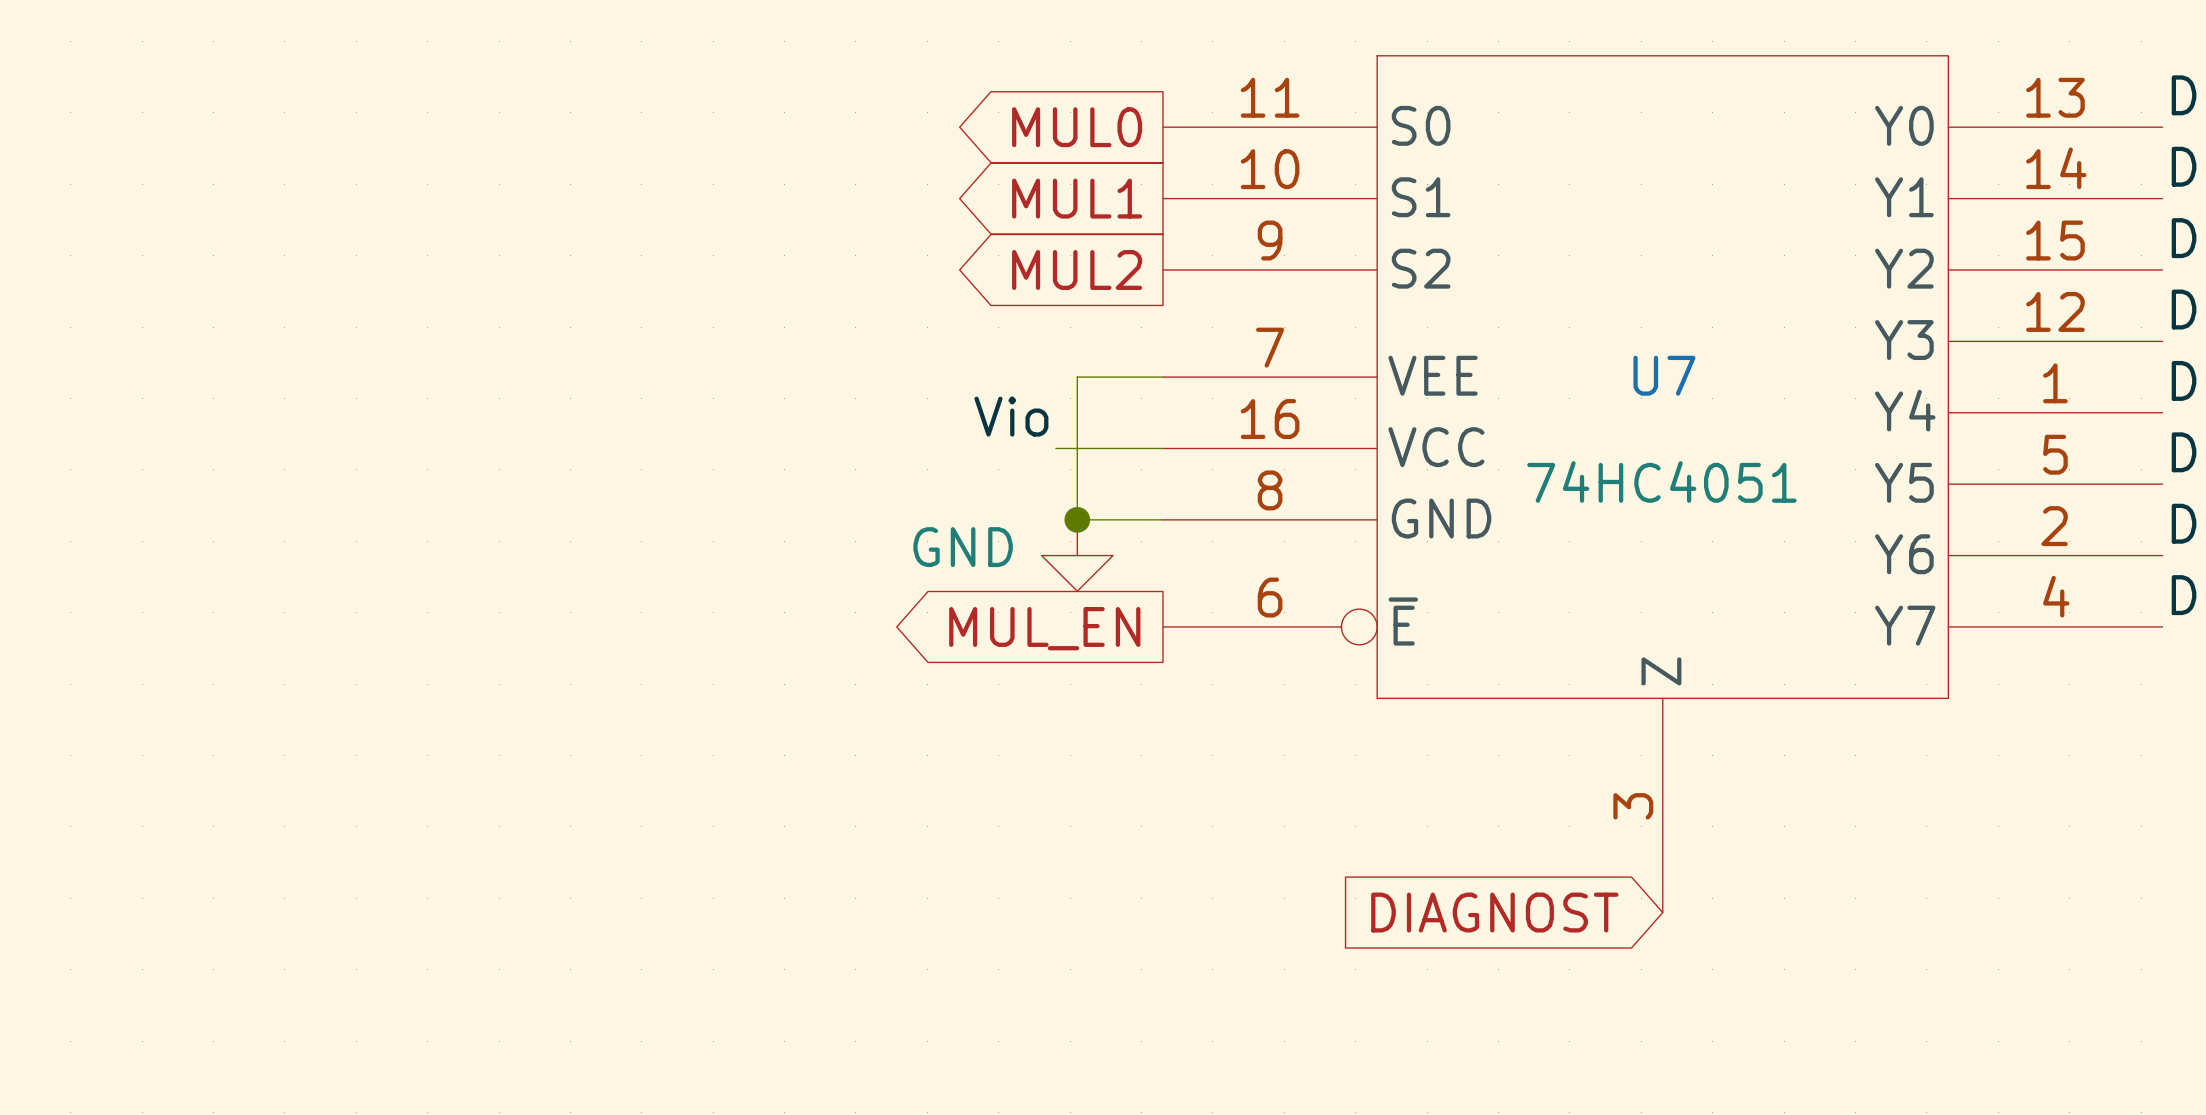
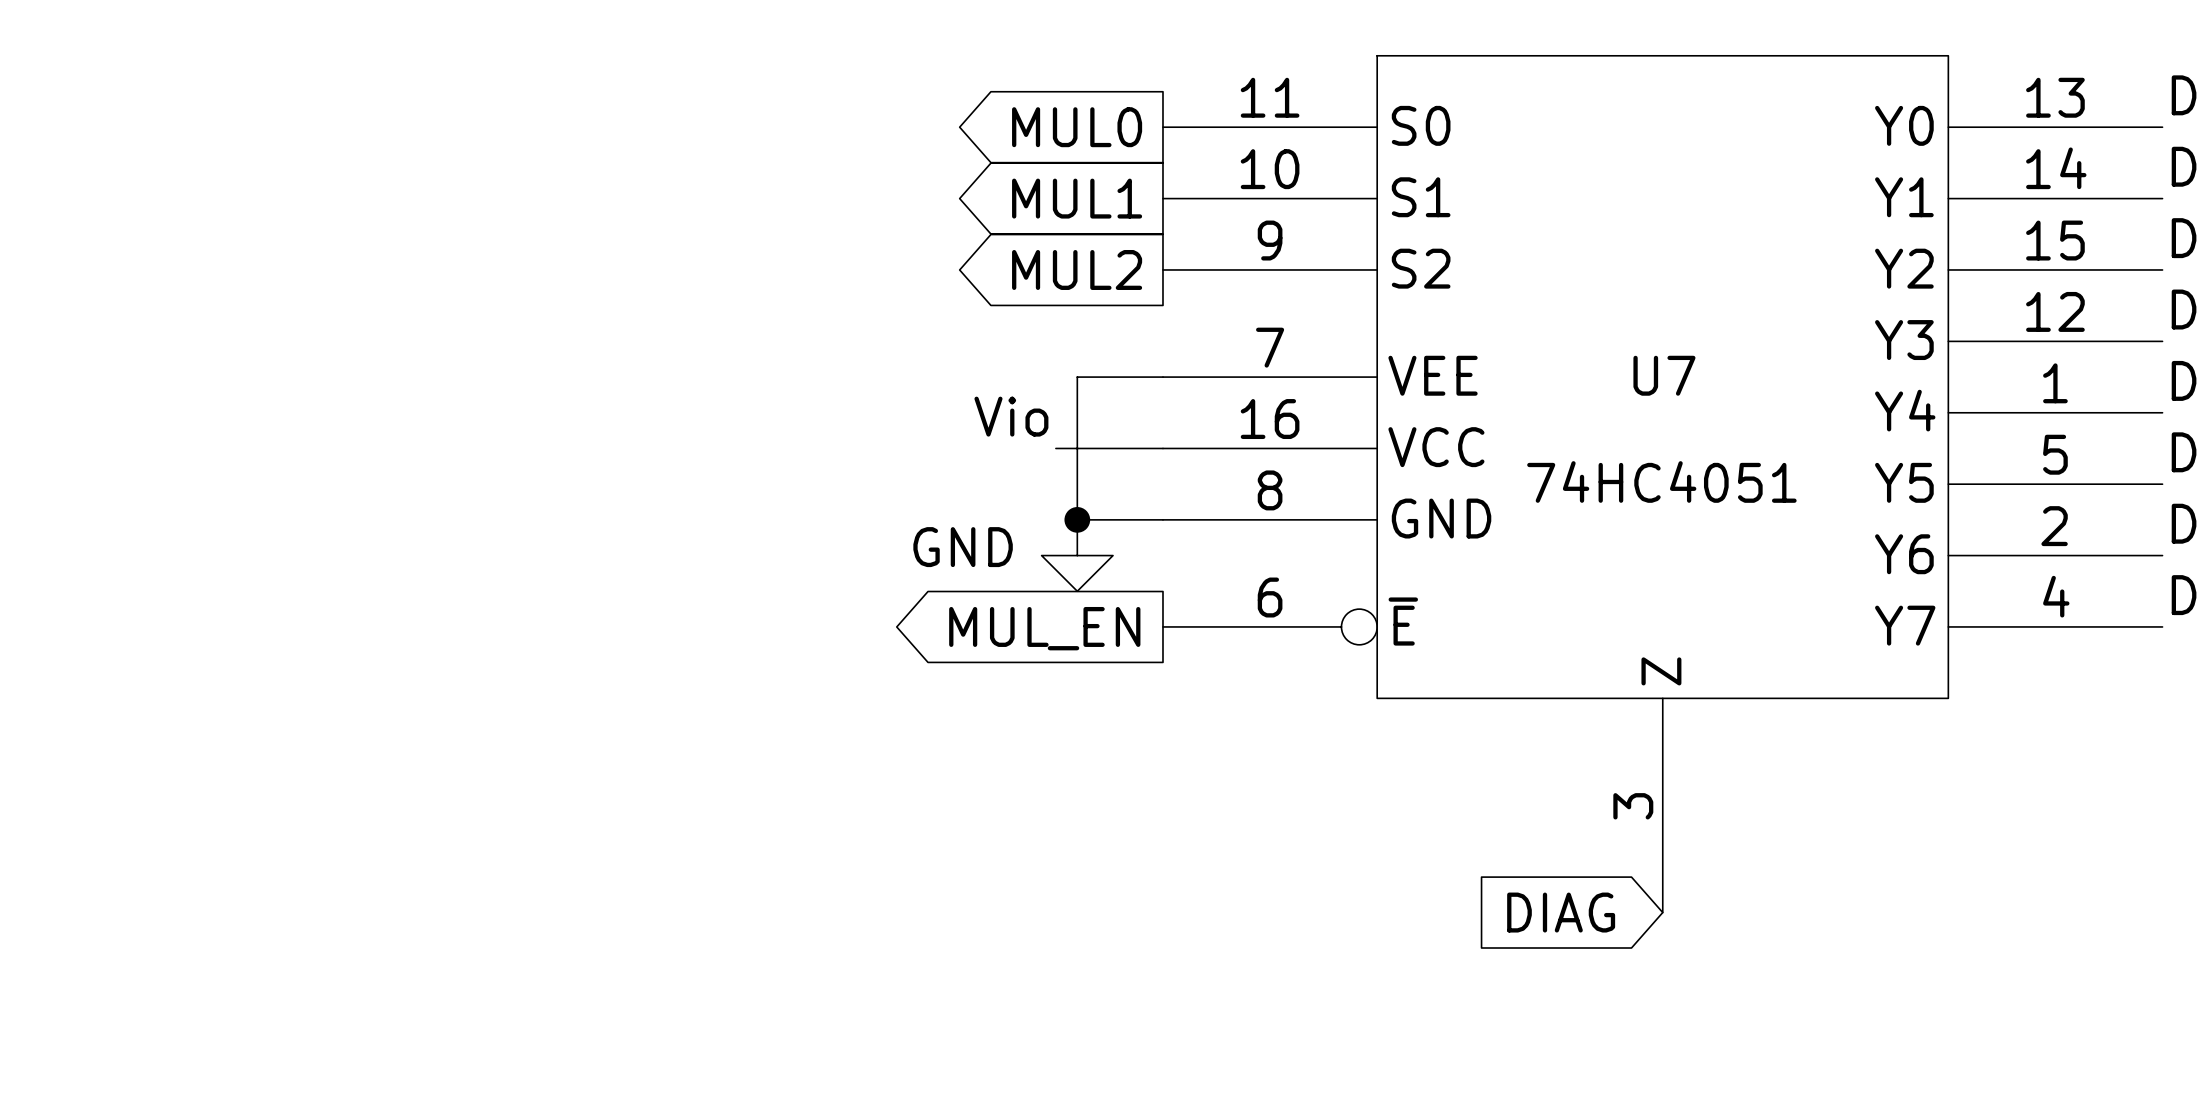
global label: DIAGNOST (1494, 912) -> DIAG (1561, 912)

